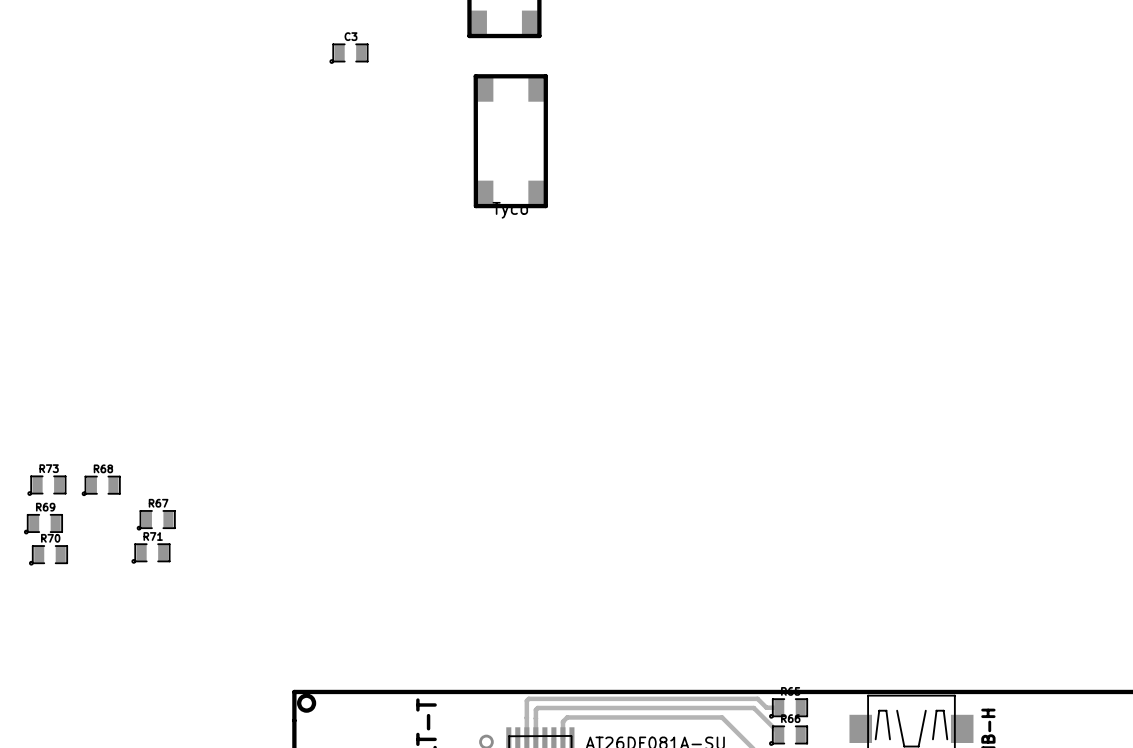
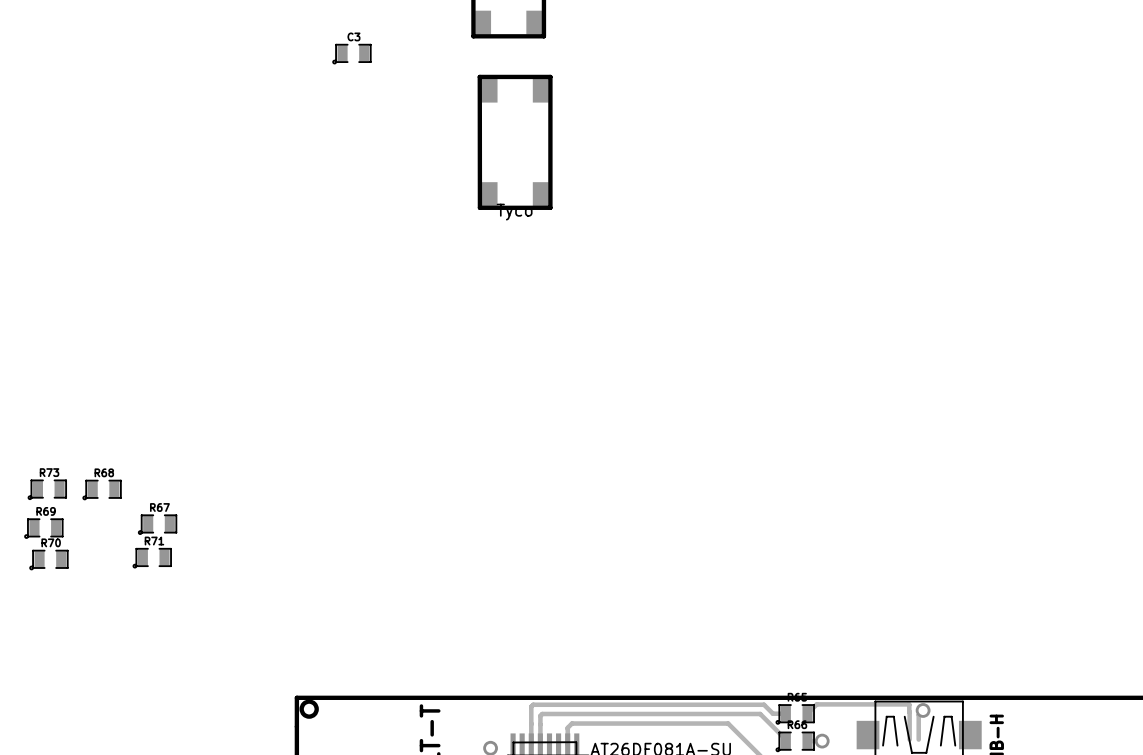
track: none -> (923, 710) (918, 714) (918, 739)
via: none -> (923, 710)
track: none -> (807, 713) (816, 704) (909, 704) (909, 739)
via: none -> (822, 741)

